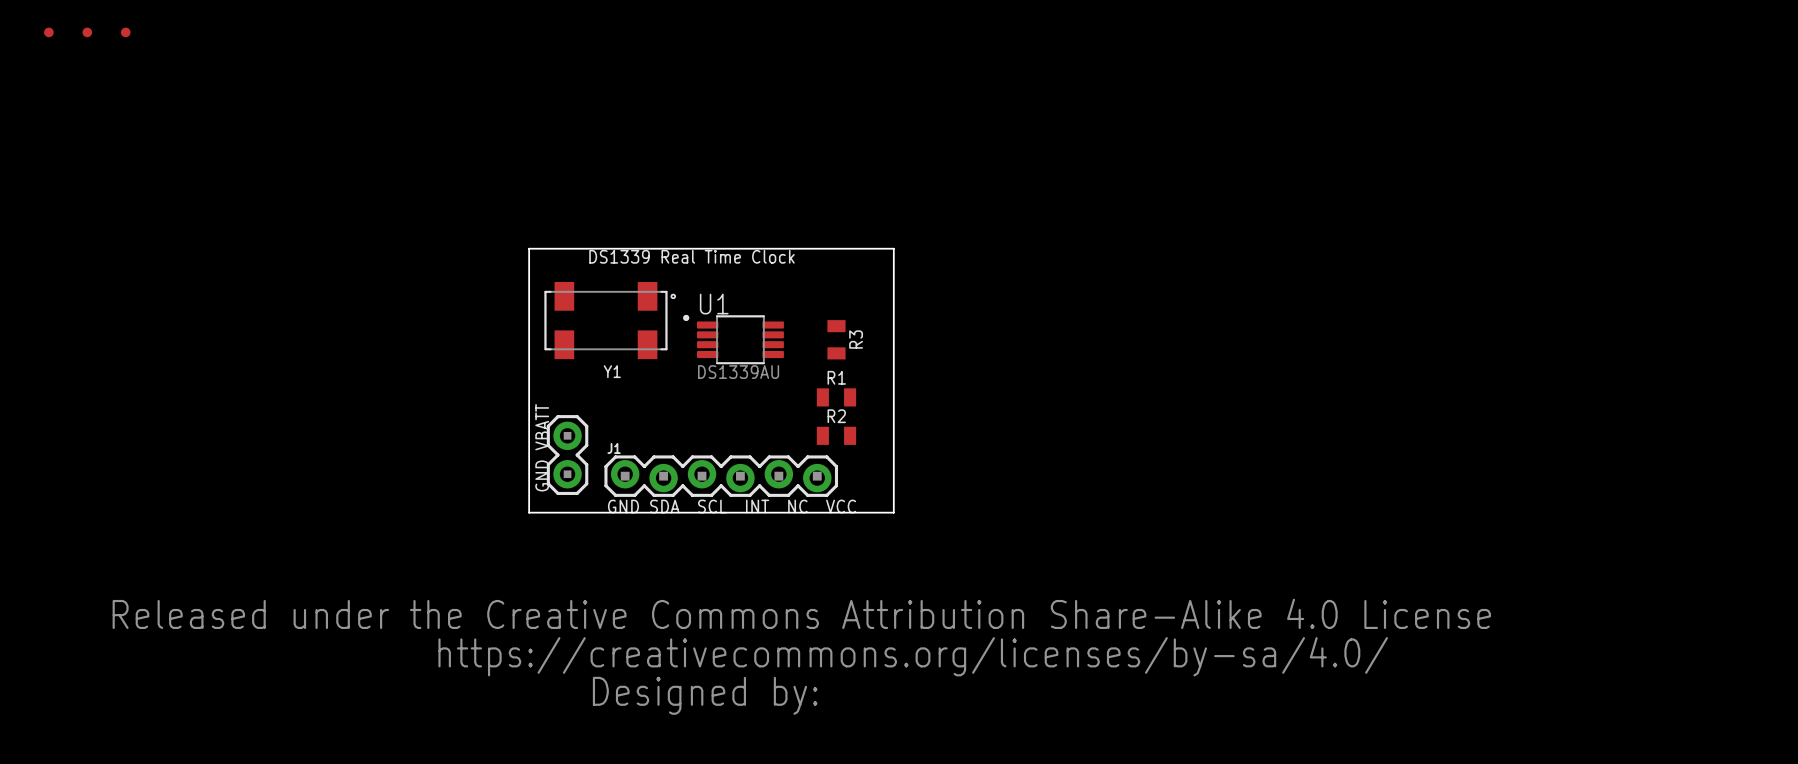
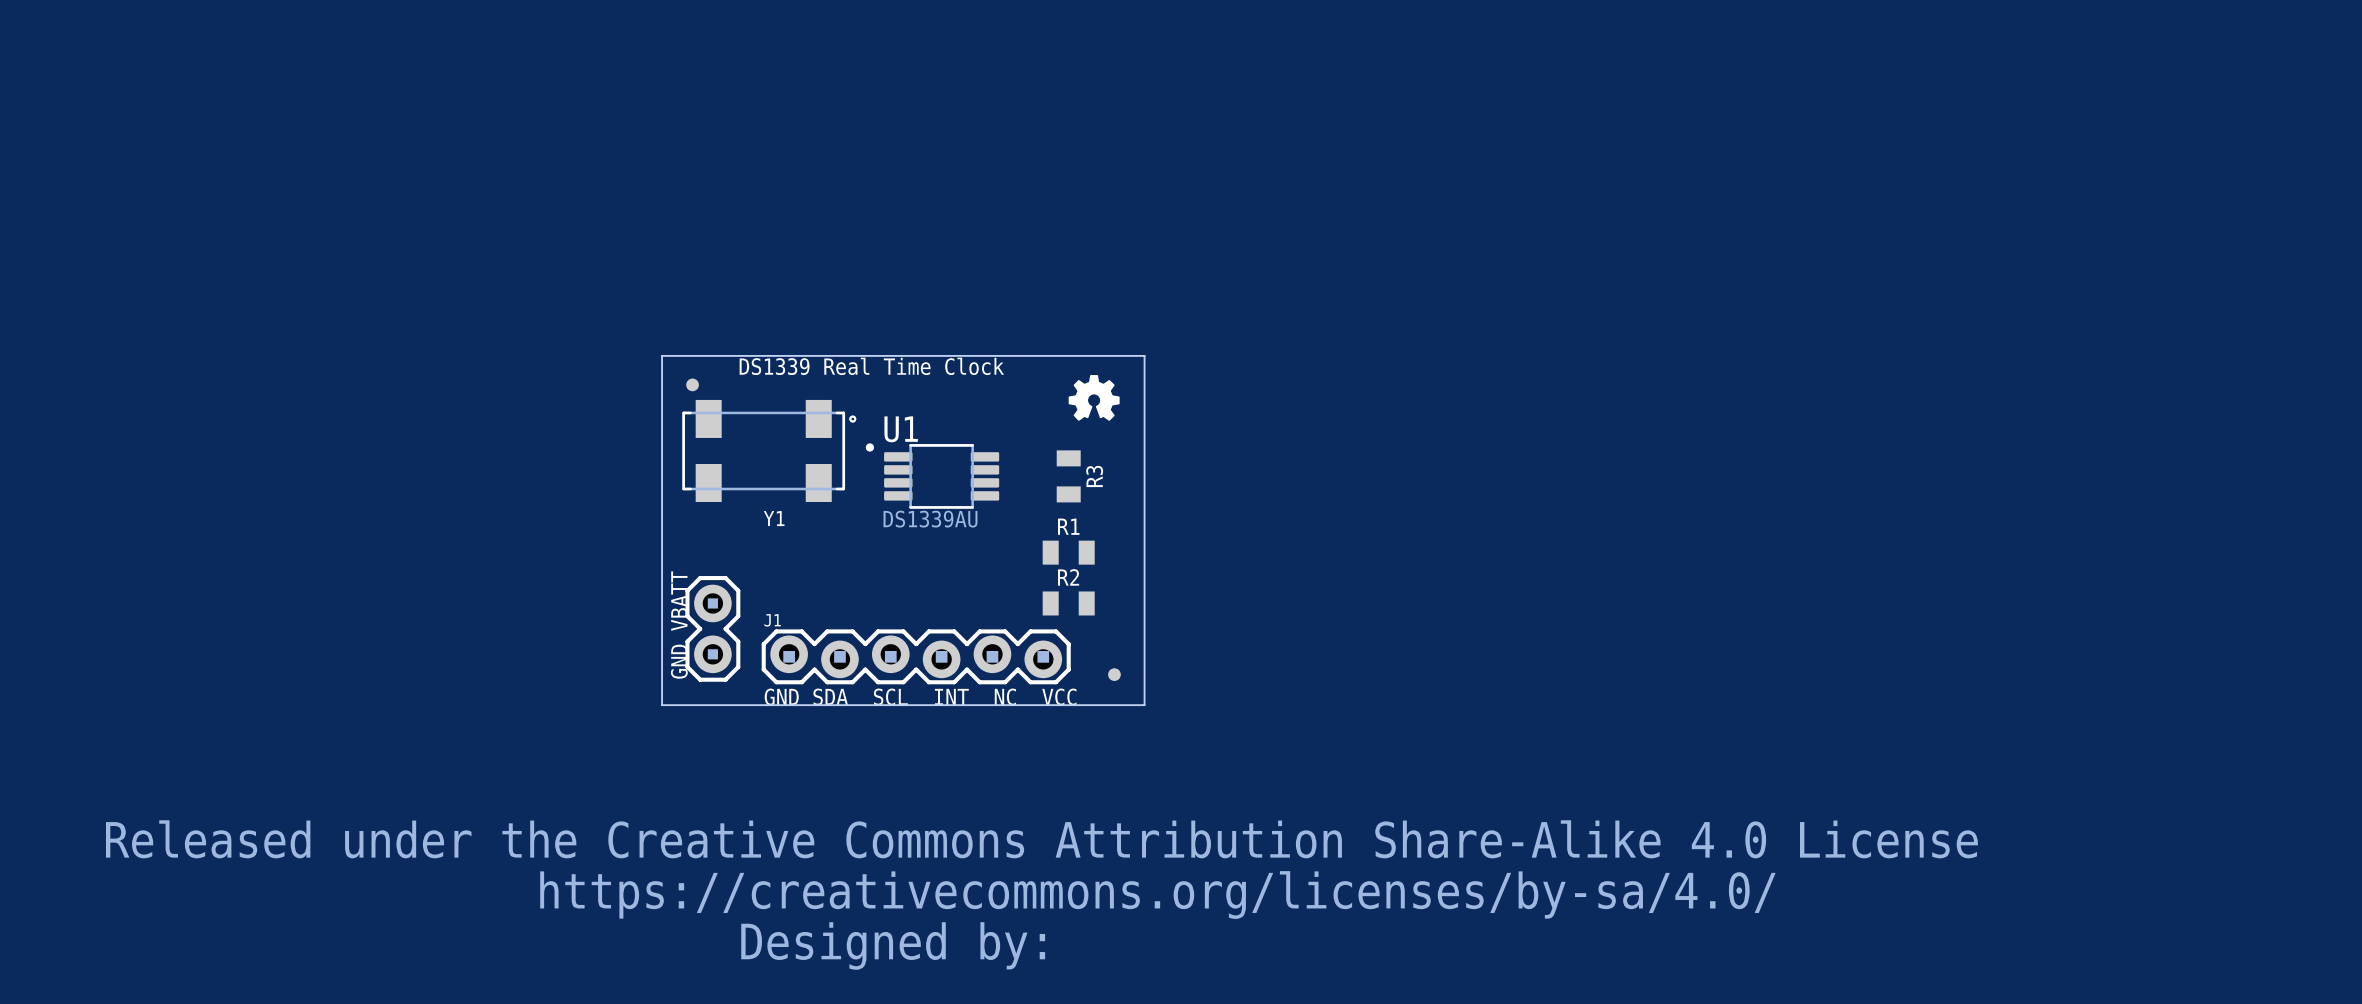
part: (48, 32) -> none
part: (87, 32) -> none
part: (125, 32) -> none
drawing: none -> [1068, 375, 1120, 421]
part: none -> (692, 384)
part: none -> (1114, 674)

